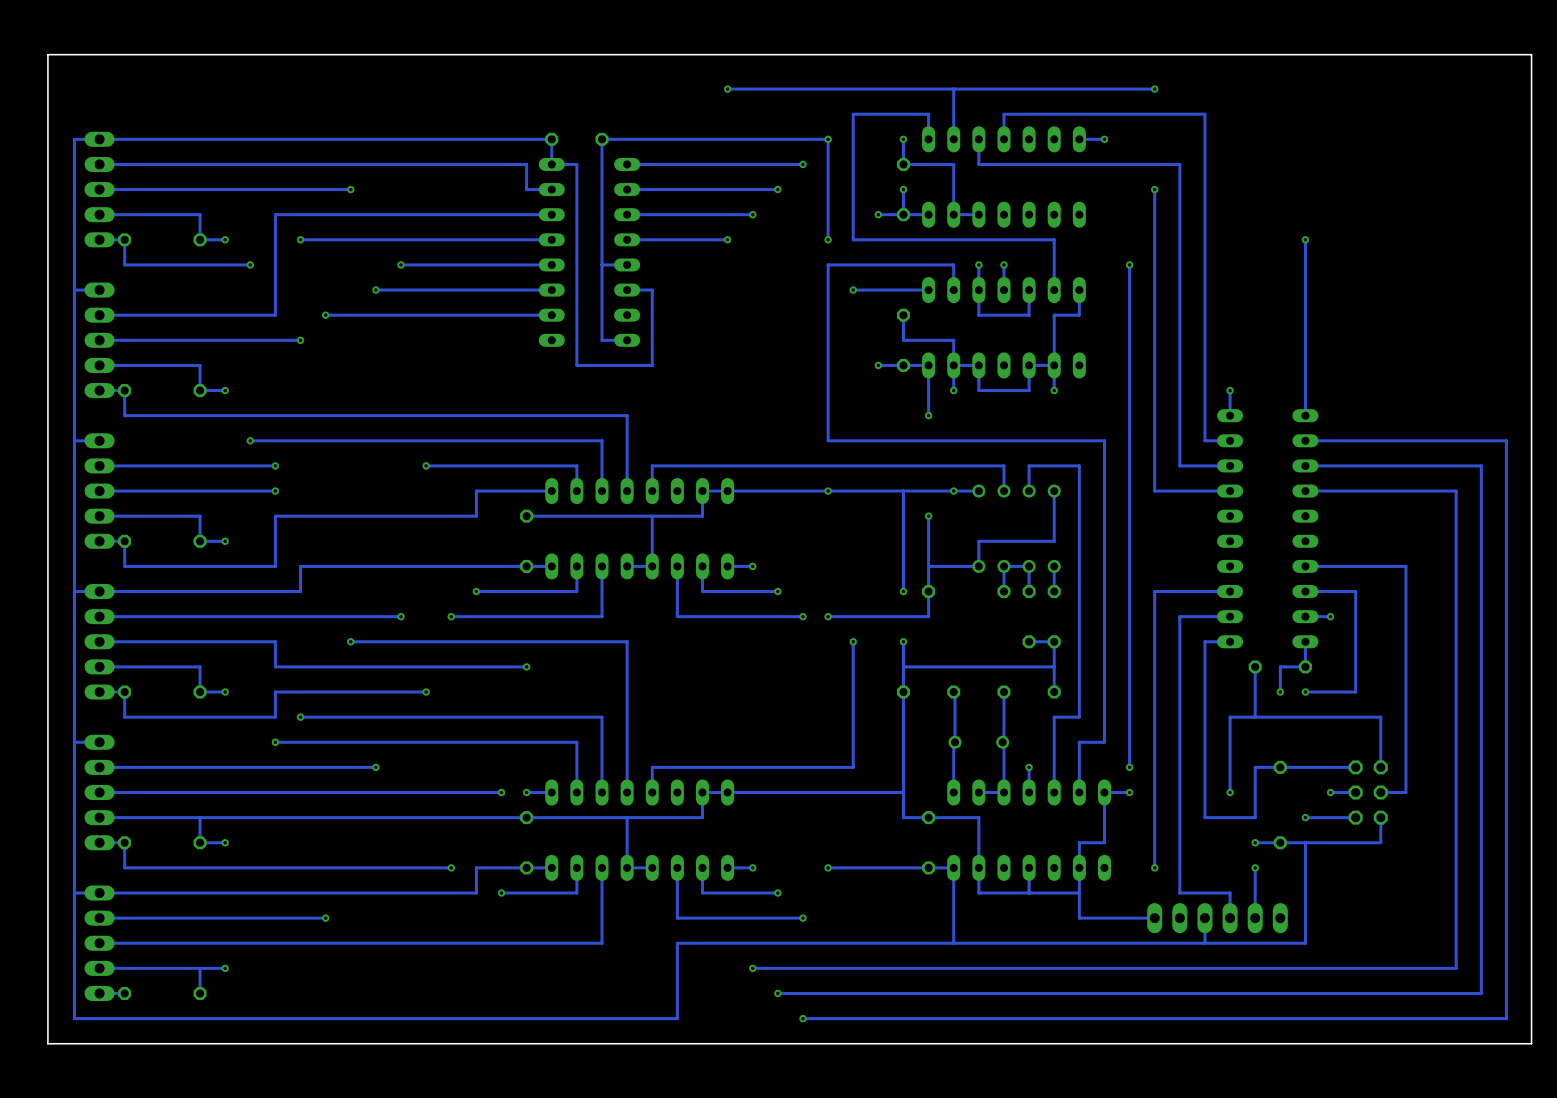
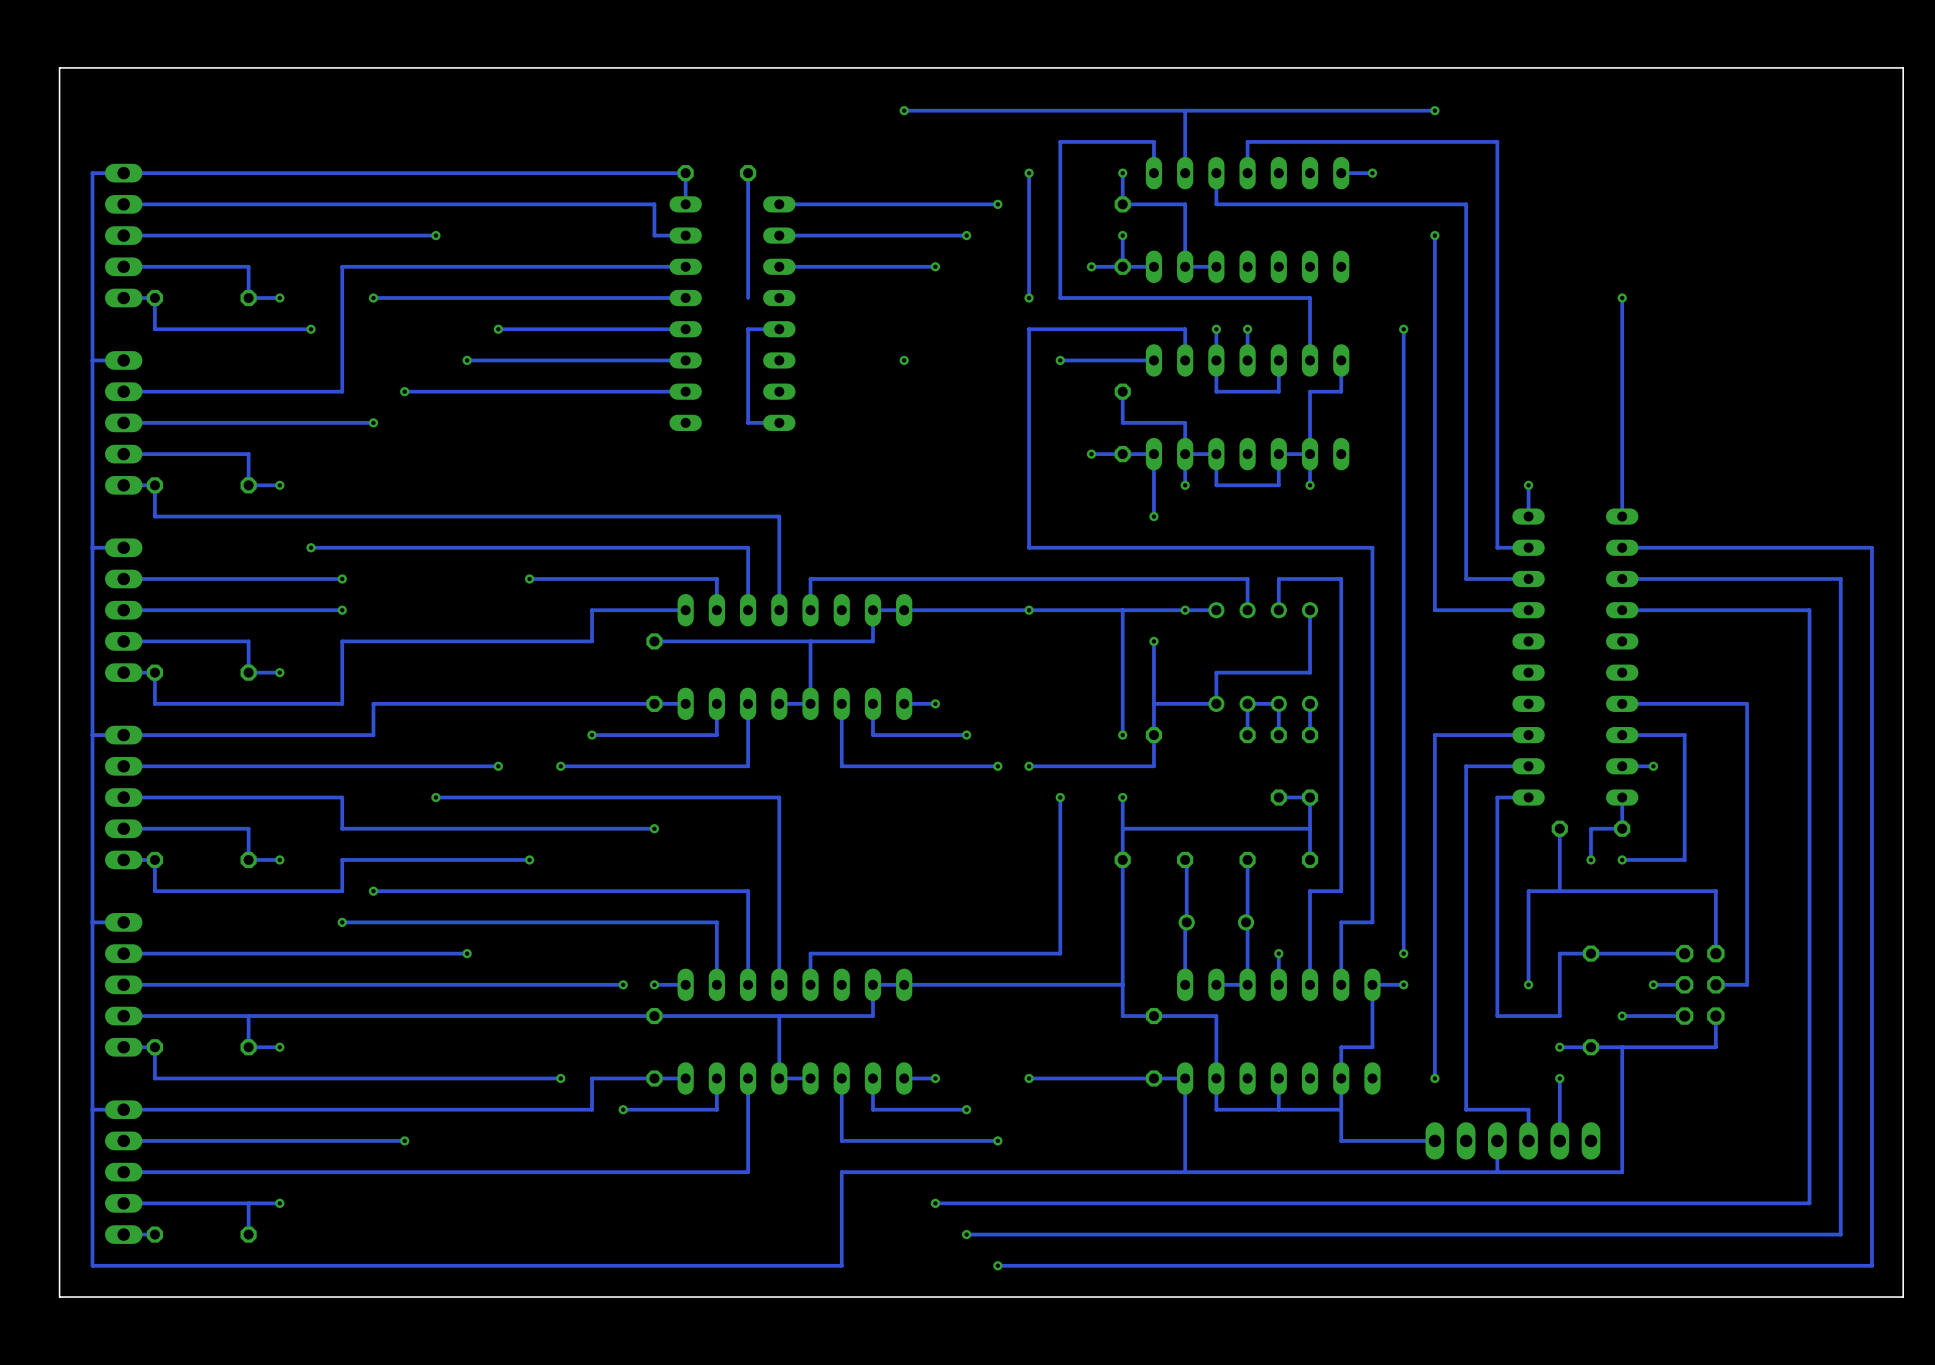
track: (828, 139) (602, 139) -> none
track: (551, 164) (576, 164) (576, 365) (652, 365) (652, 290) (627, 290) -> none
track: (602, 239) (602, 264) -> none
track: (727, 239) (627, 239) -> none
via position: (727, 239) -> (904, 360)

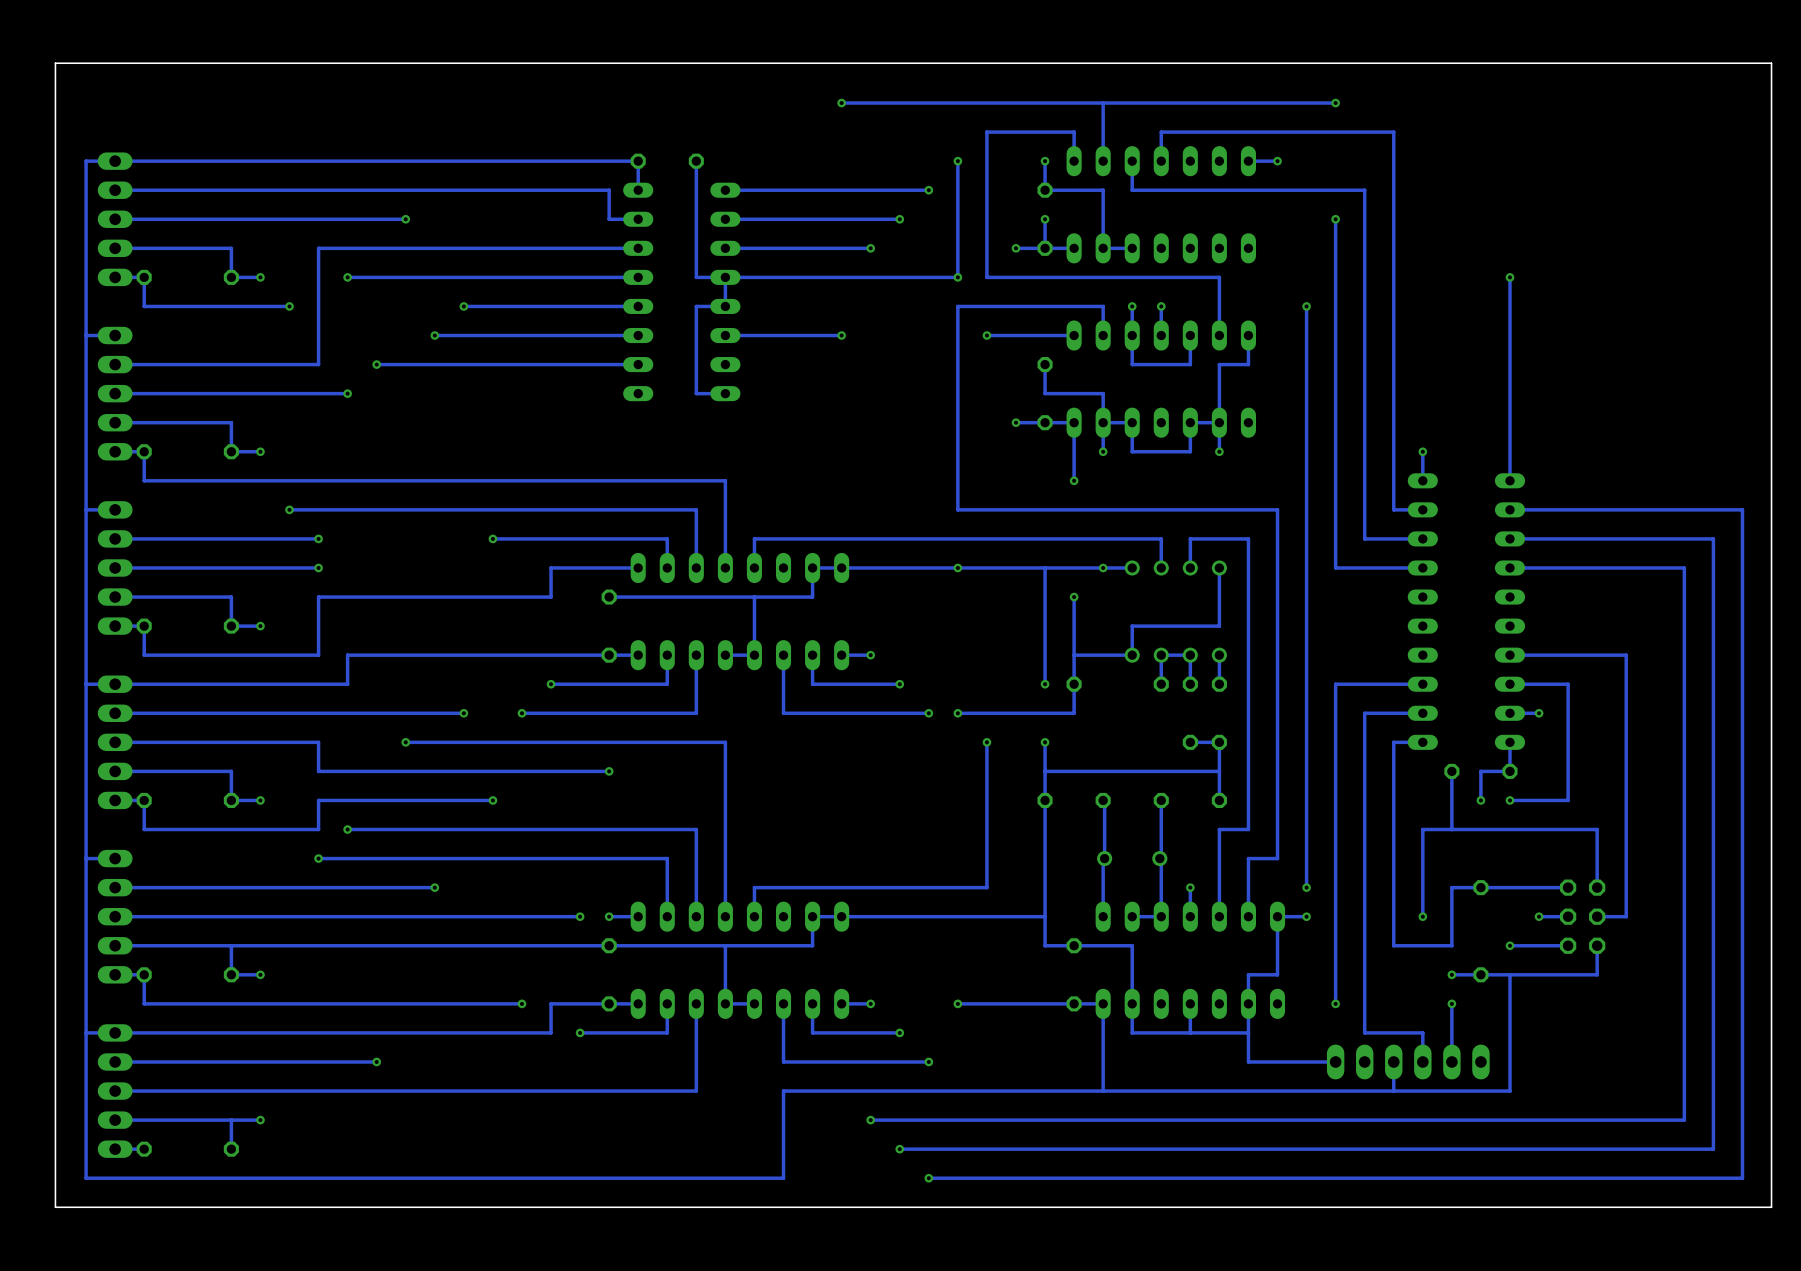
track: none -> (725, 277) (725, 306)
track: none -> (957, 277) (696, 277)
track: none -> (841, 335) (725, 335)

